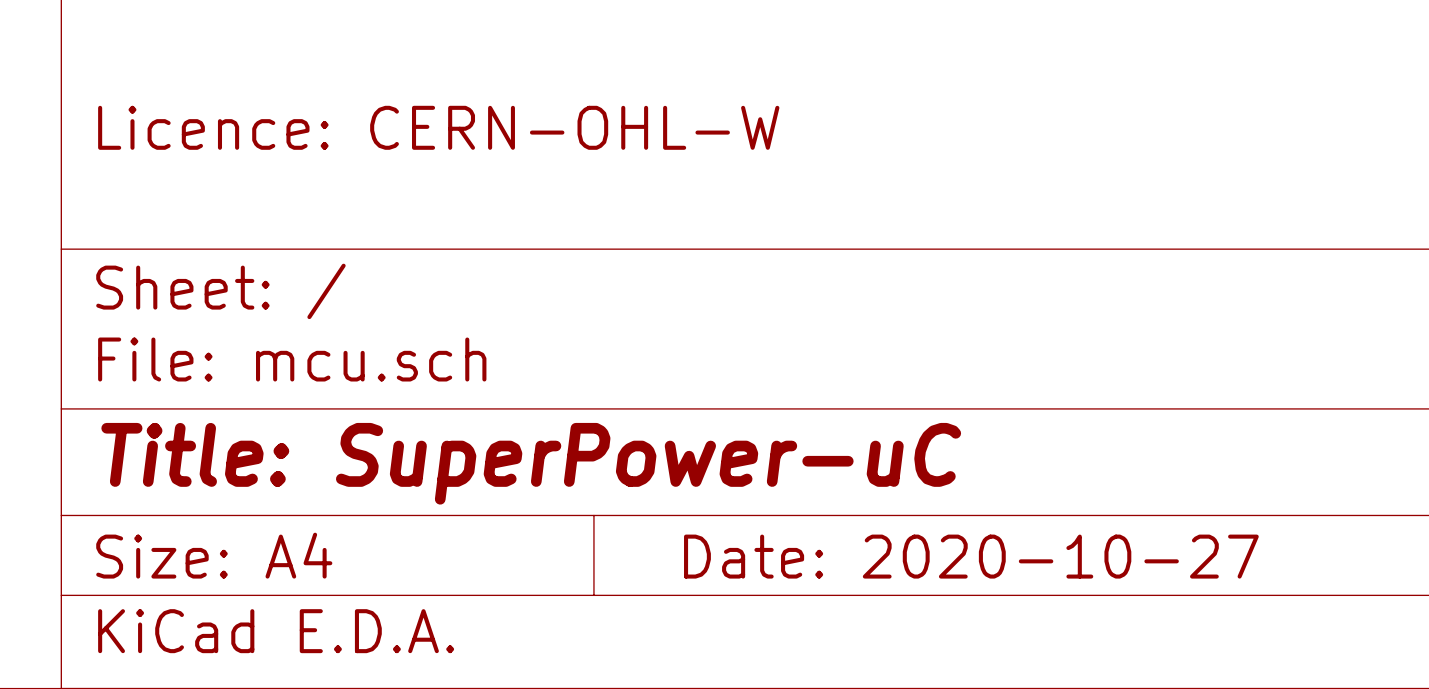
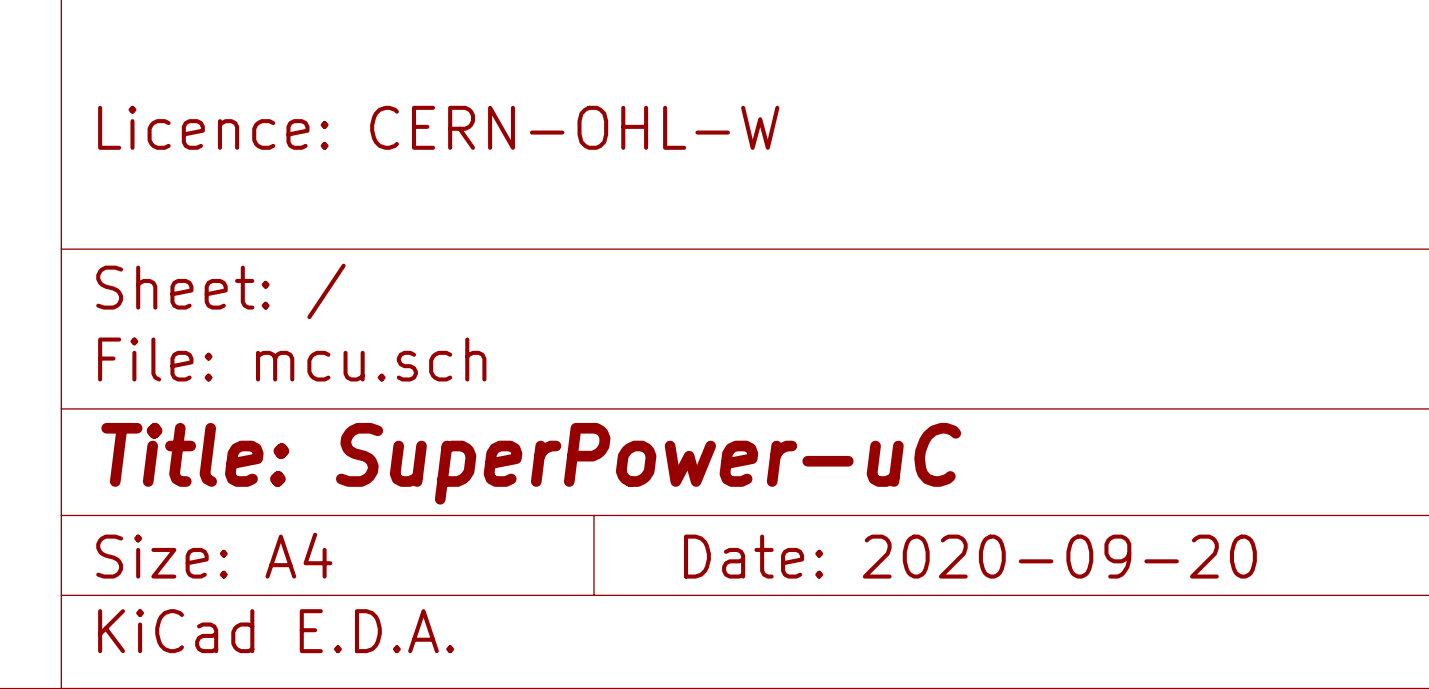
title block: Date: 2020-10-27 (971, 556) -> Date: 2020-09-20 (970, 556)

